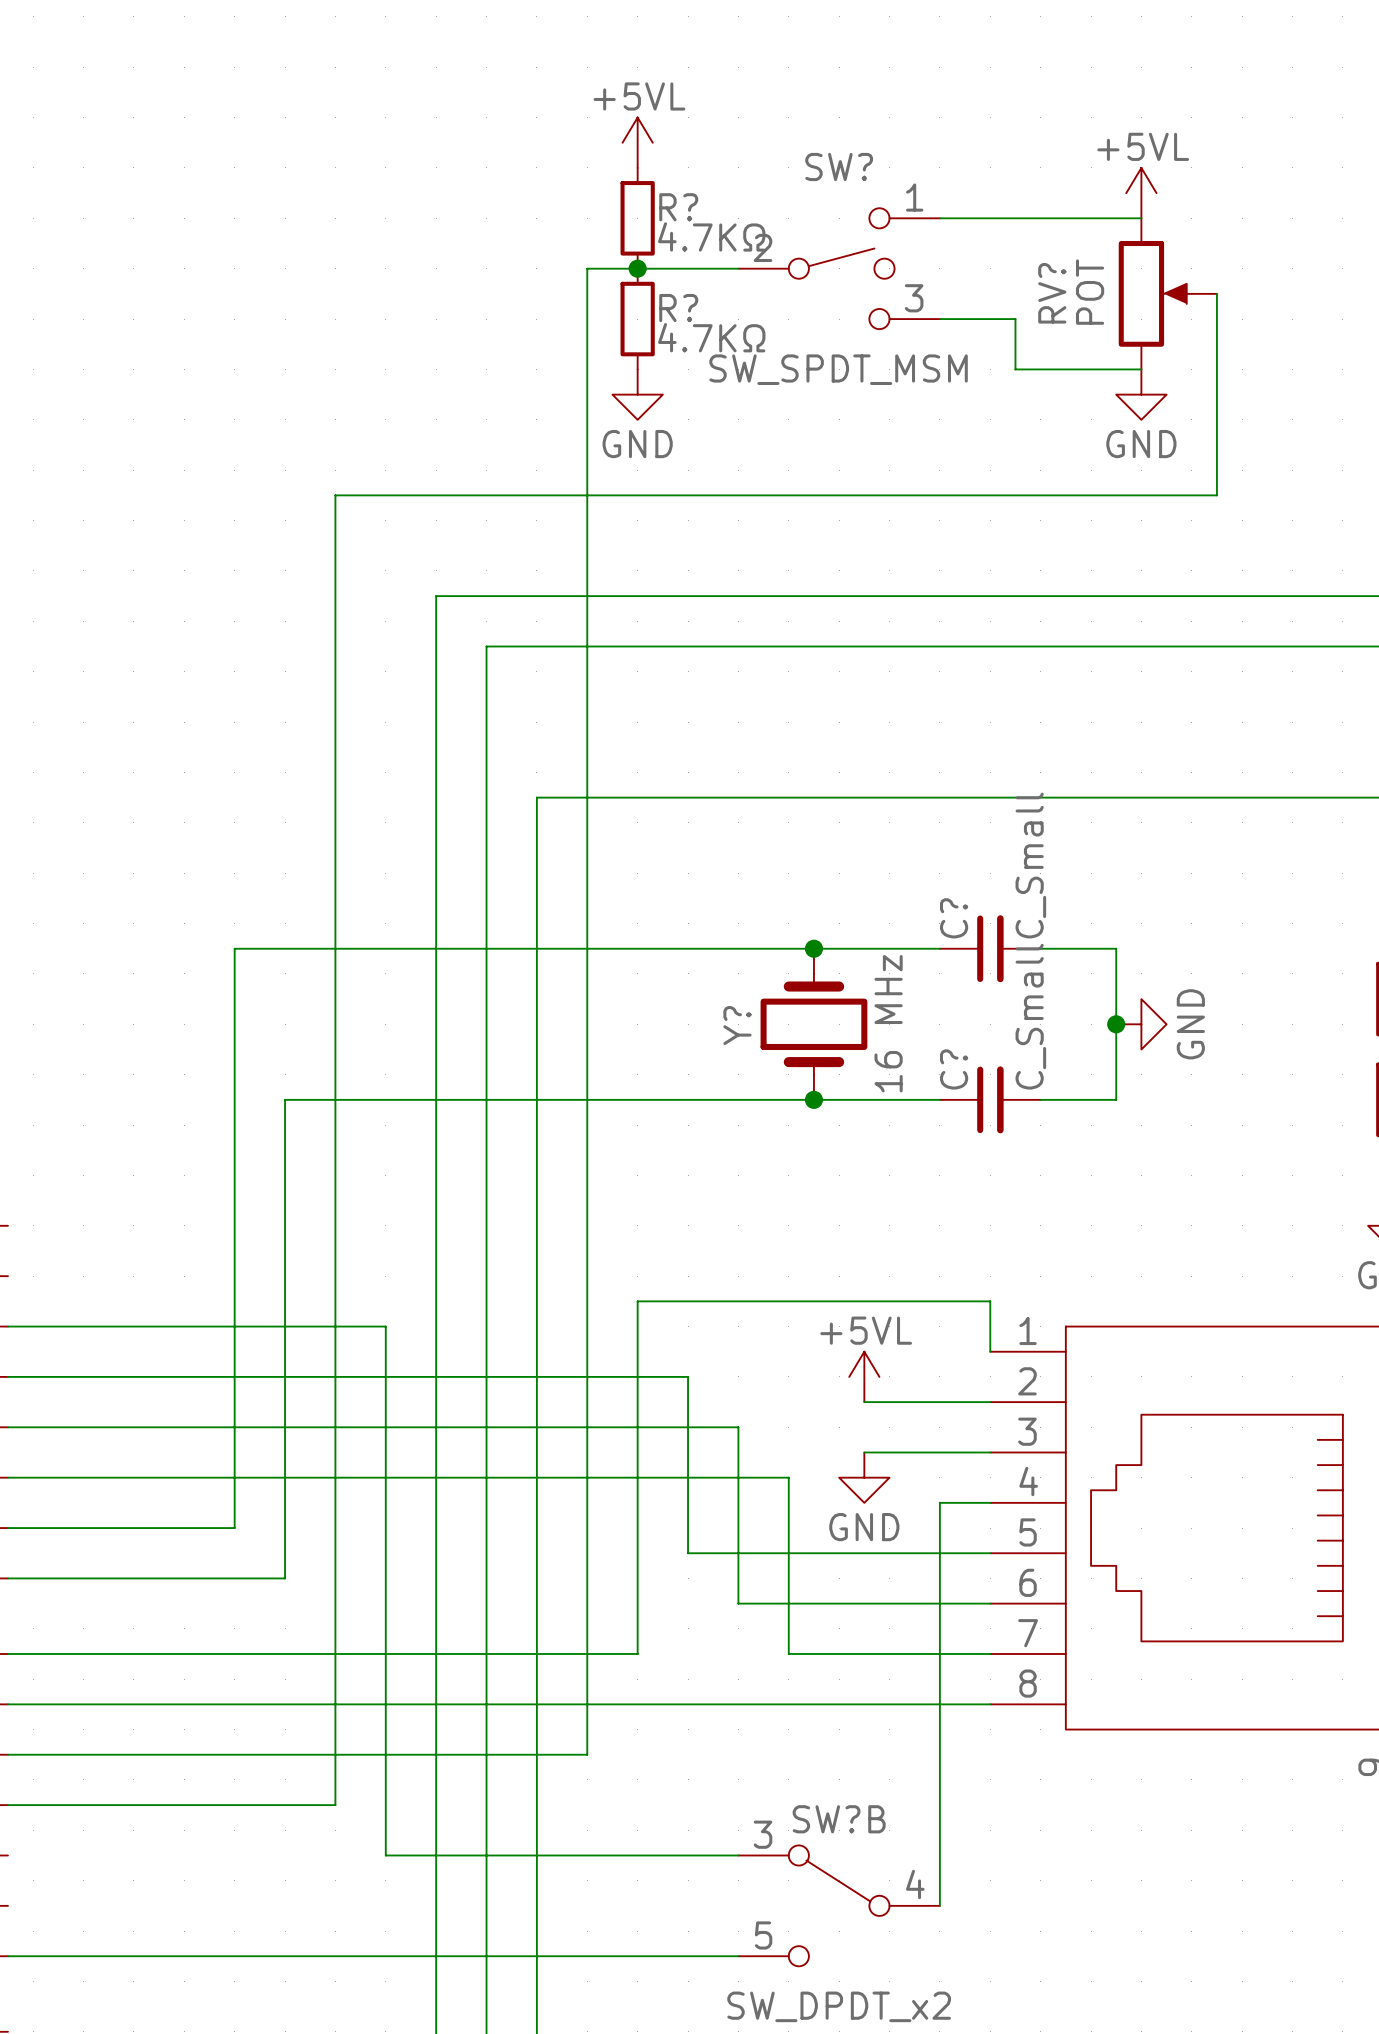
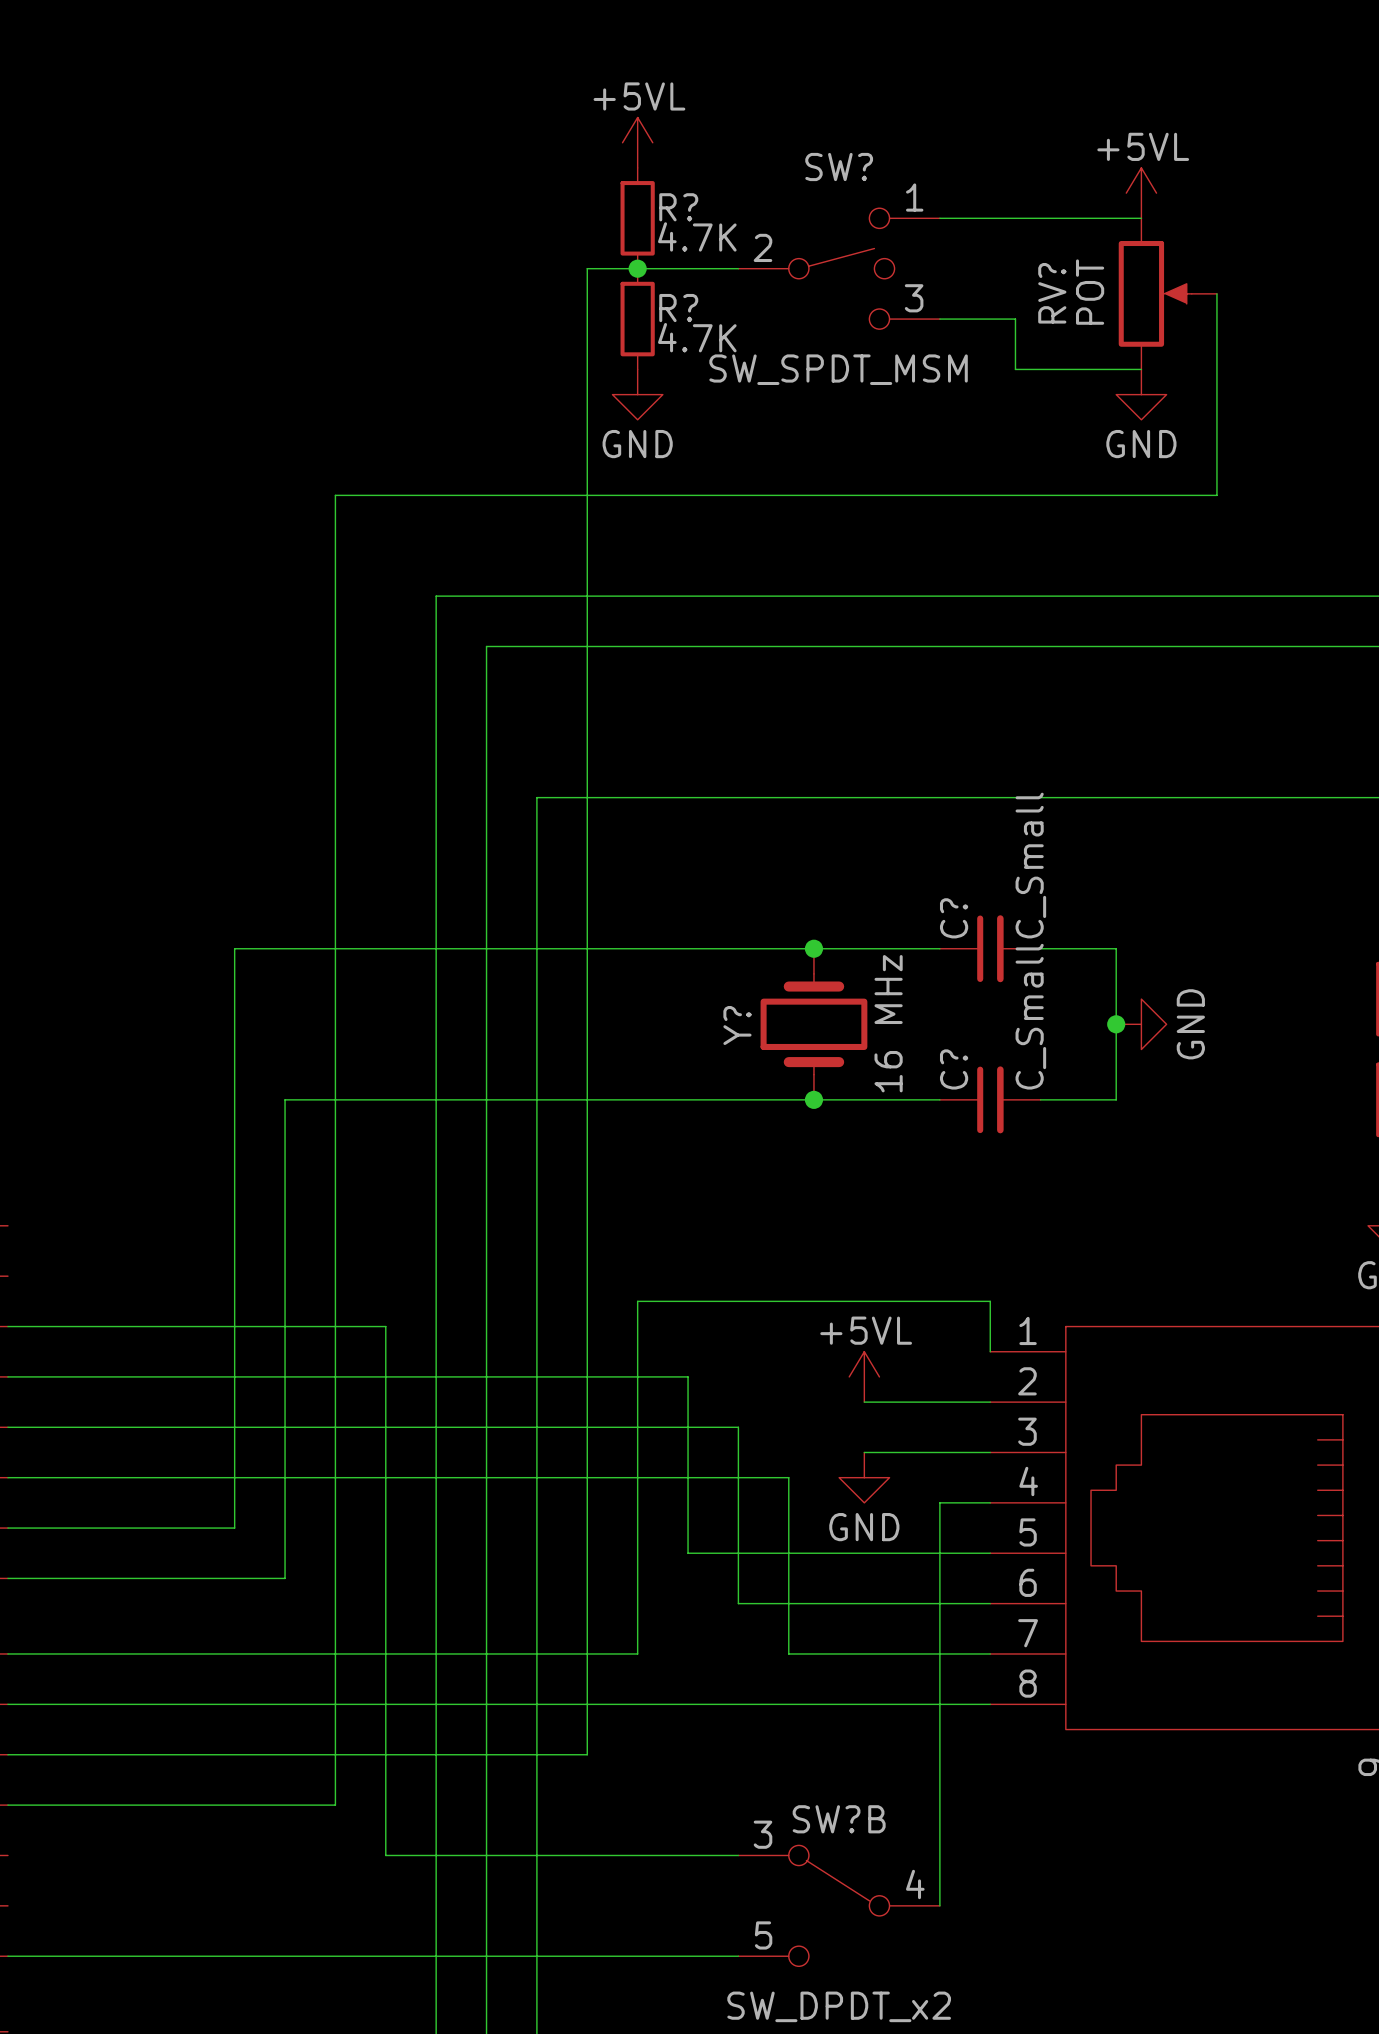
R? value: 4.7KΩ (711, 236) -> 4.7K (697, 236)
R? value: 4.7KΩ (711, 337) -> 4.7K (697, 337)

